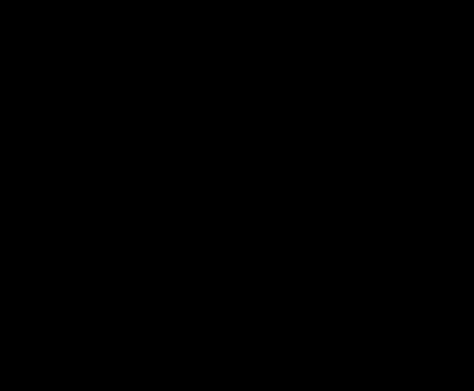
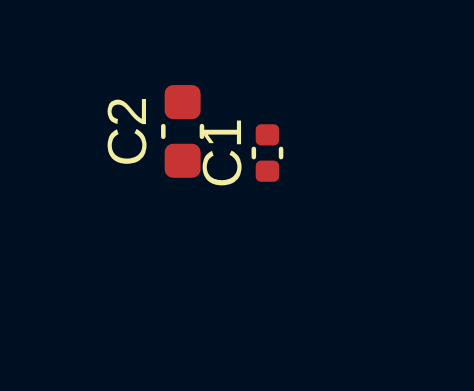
C2: none -> (182, 131)
C1: none -> (267, 153)

